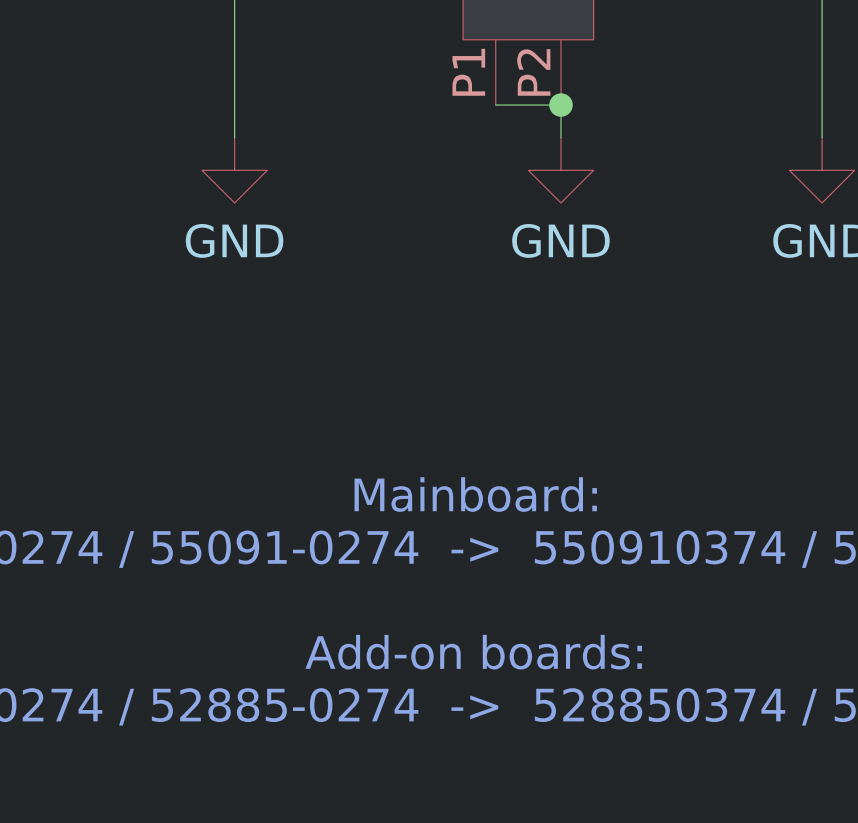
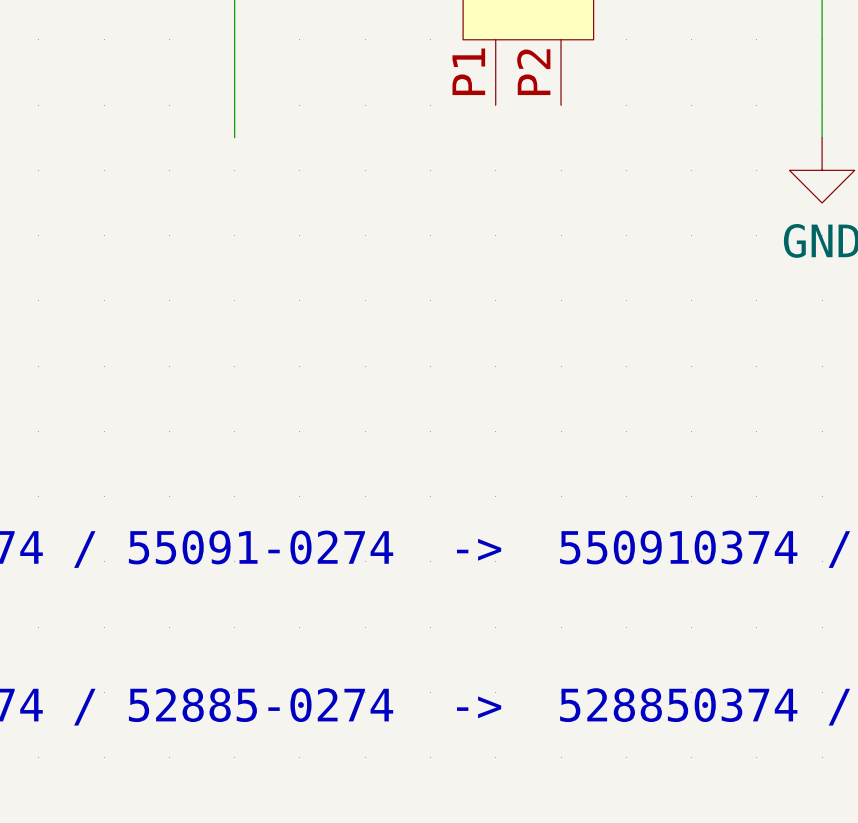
wire: (495, 105) (561, 105) (561, 137) -> none
junction: (561, 105) -> none
power symbol: GND (234, 170) -> none
power symbol: GND (561, 170) -> none
text: Mainboard: (475, 494) -> none
text: Add-on boards: (473, 652) -> none

